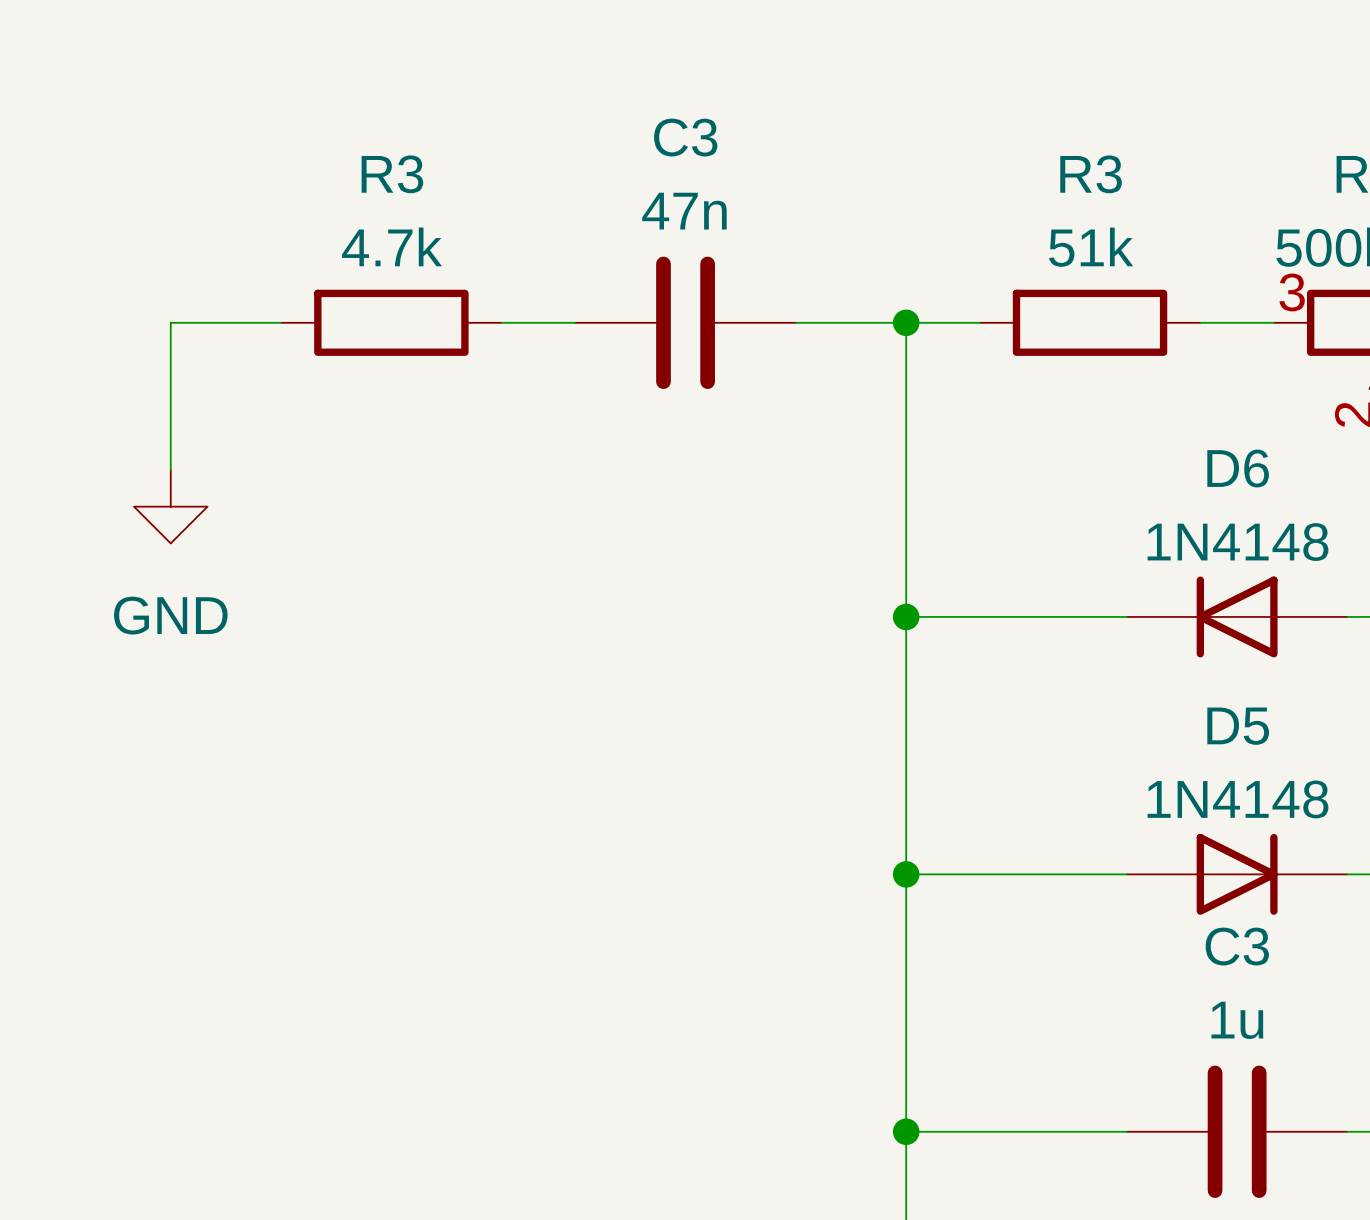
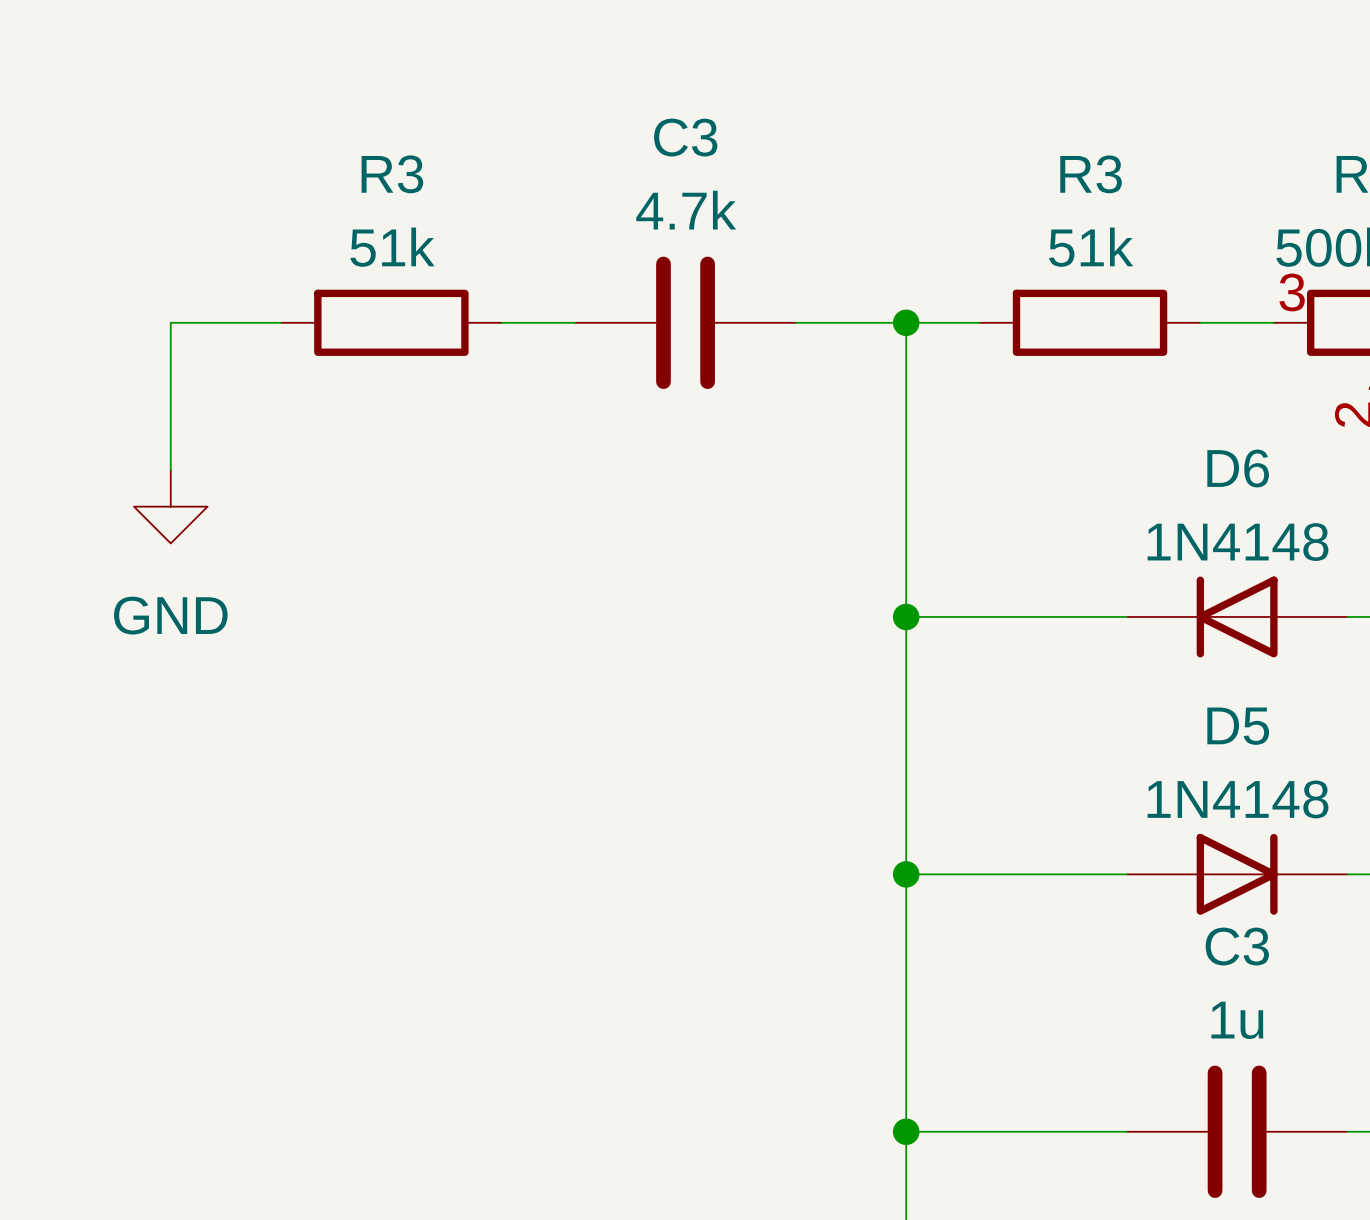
C3 value: 47n (684, 211) -> 4.7k (686, 210)
R3 value: 4.7k (392, 246) -> 51k (392, 247)

